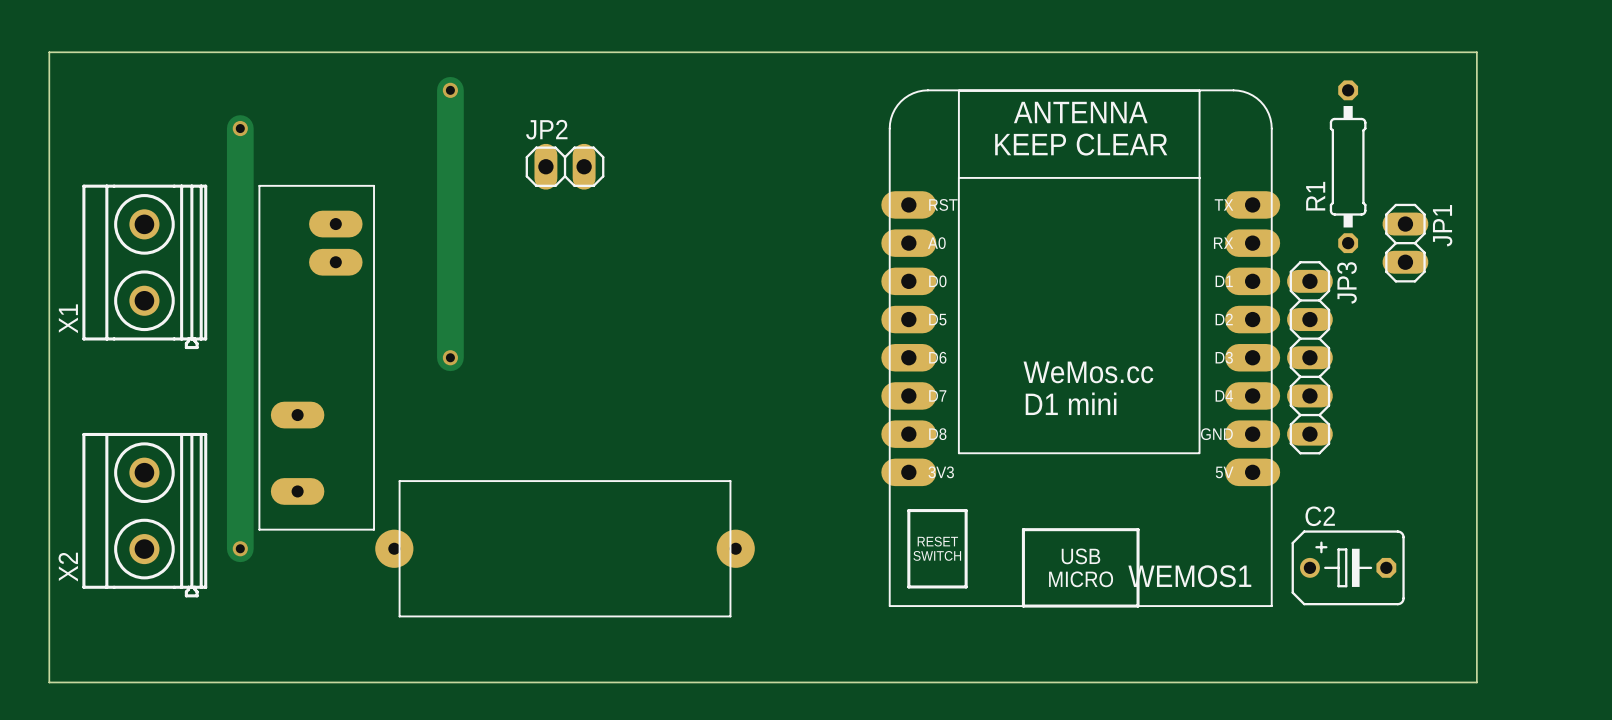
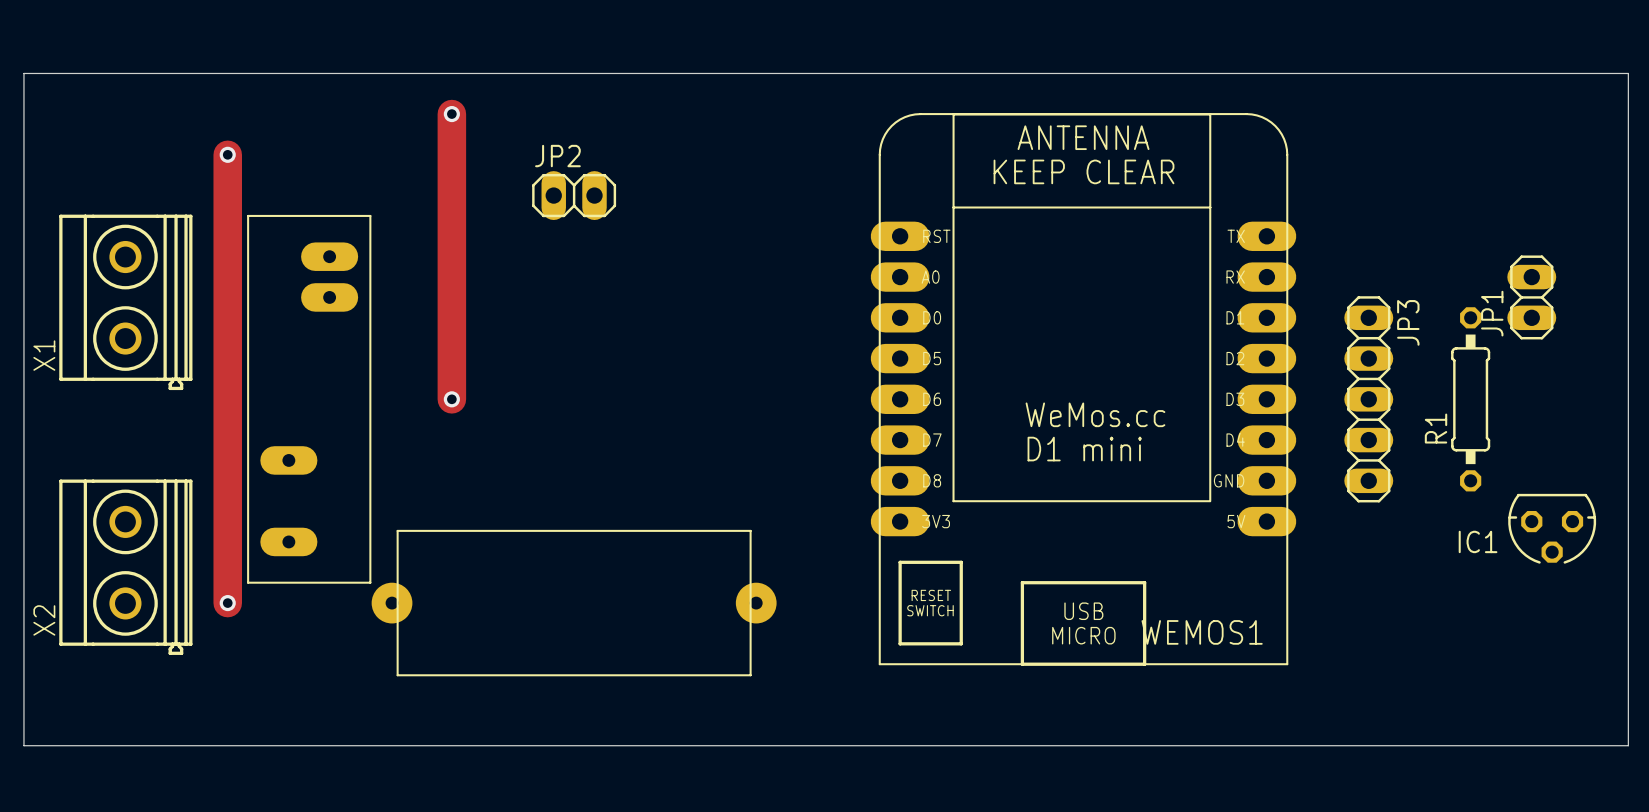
board edge: (1476, 52) (1476, 682) -> (1546, 73) (1628, 73) (1628, 745) (1546, 745)
R1 position: (1348, 166) -> (1470, 399)
JP1 name position: JP1 (1442, 225) -> JP1 (1492, 313)
JP1 position: (1405, 243) -> (1531, 297)
WEMOS1 position: (1080, 348) -> (1083, 389)
IC1: none -> (1552, 528)
C2: (1348, 567) -> none

